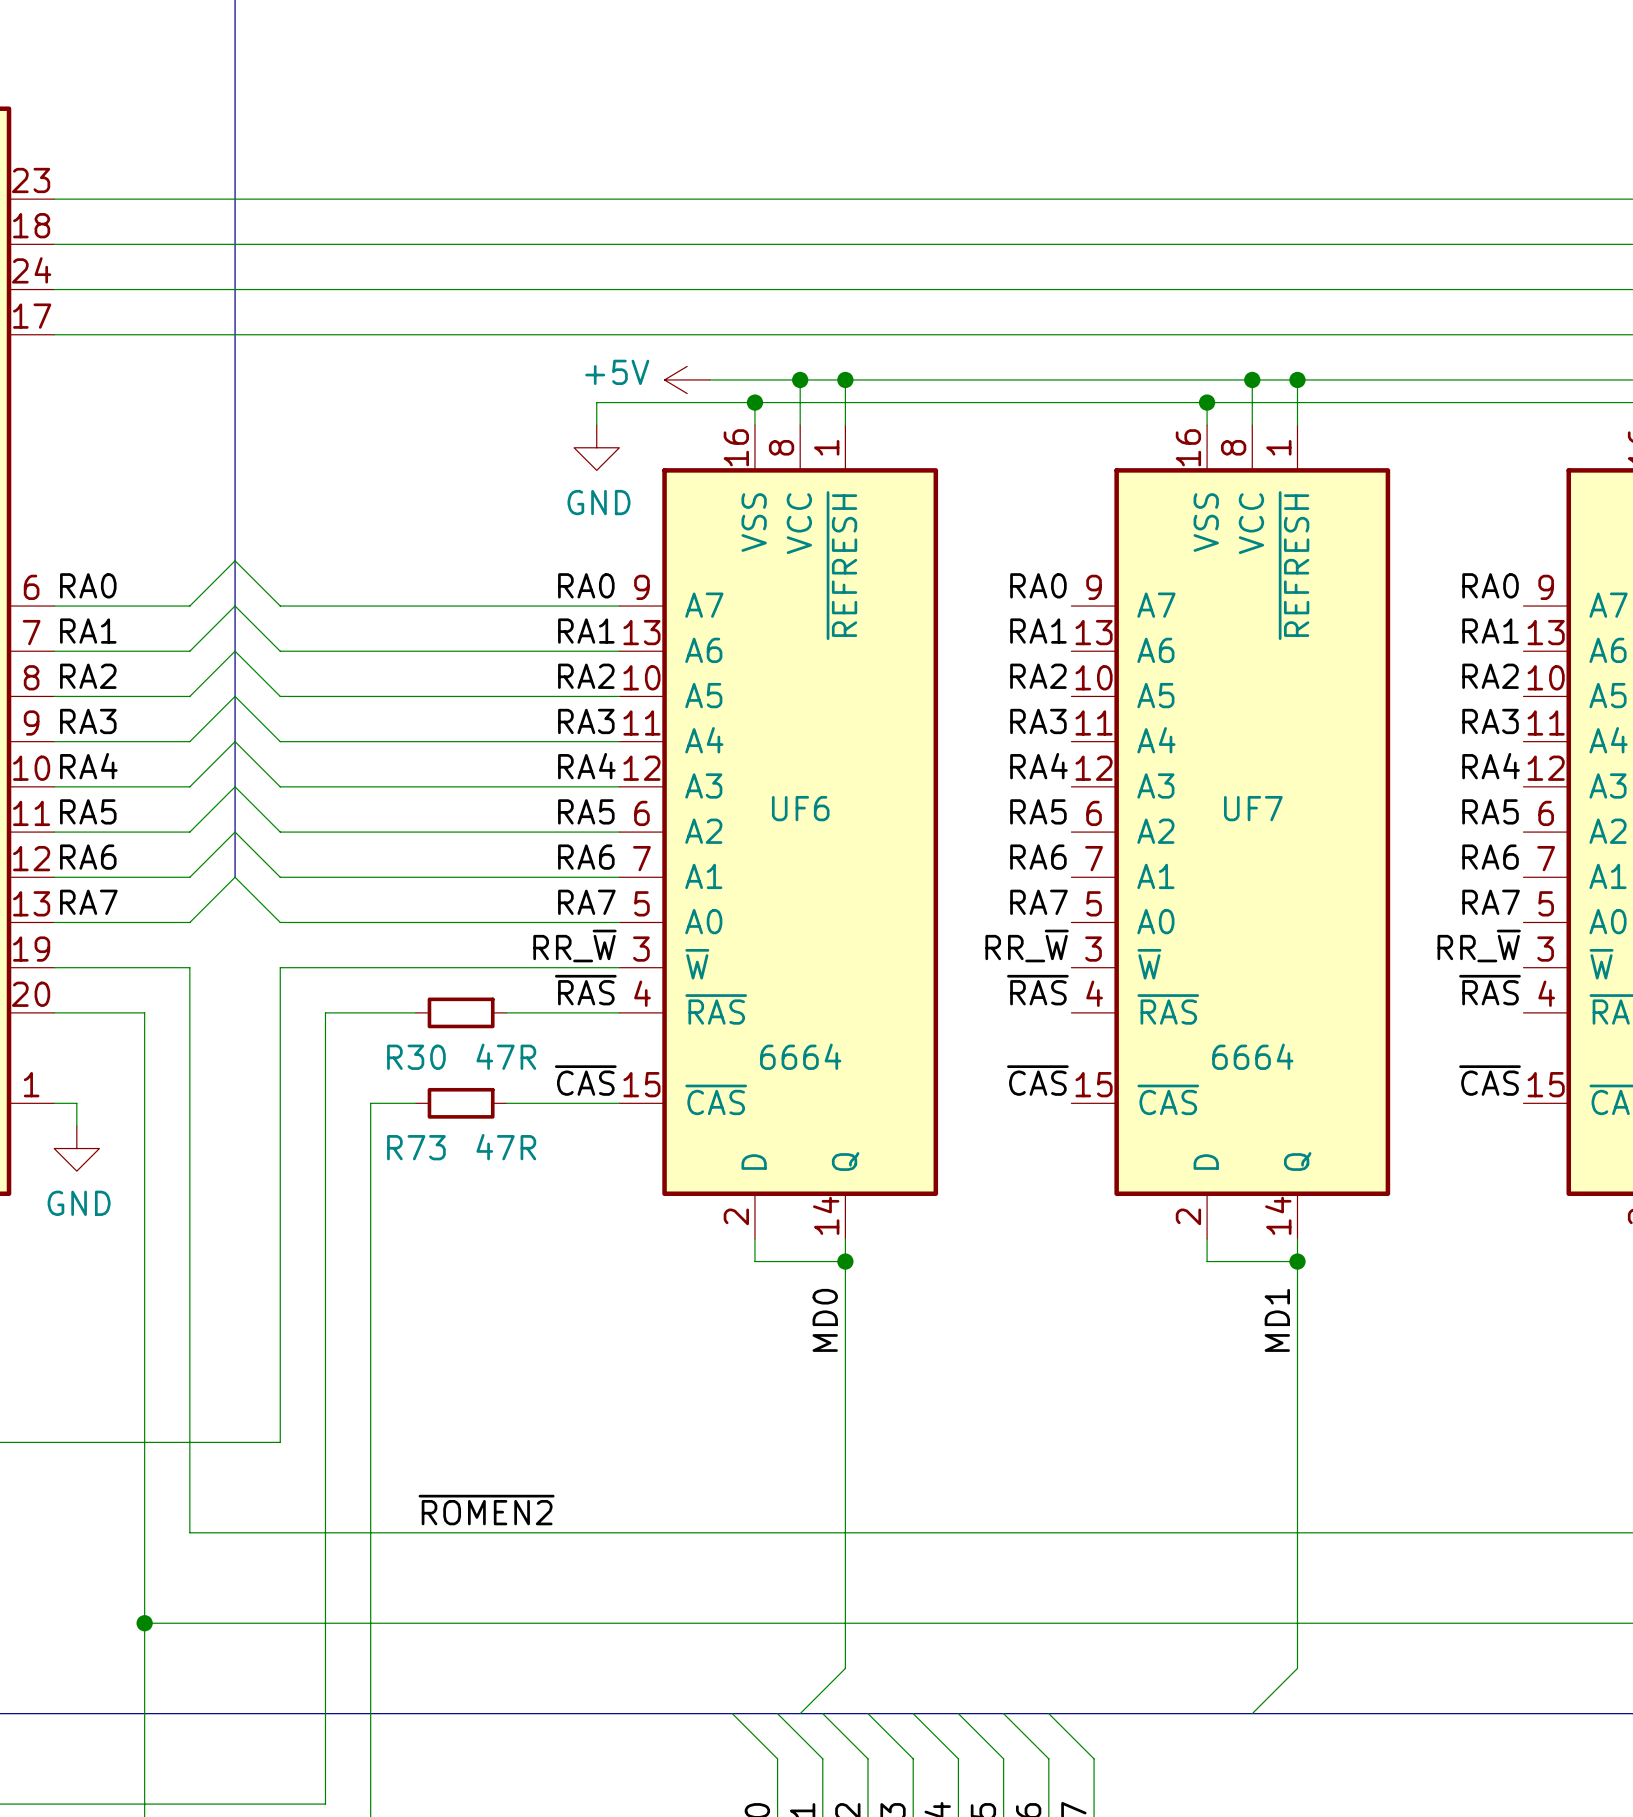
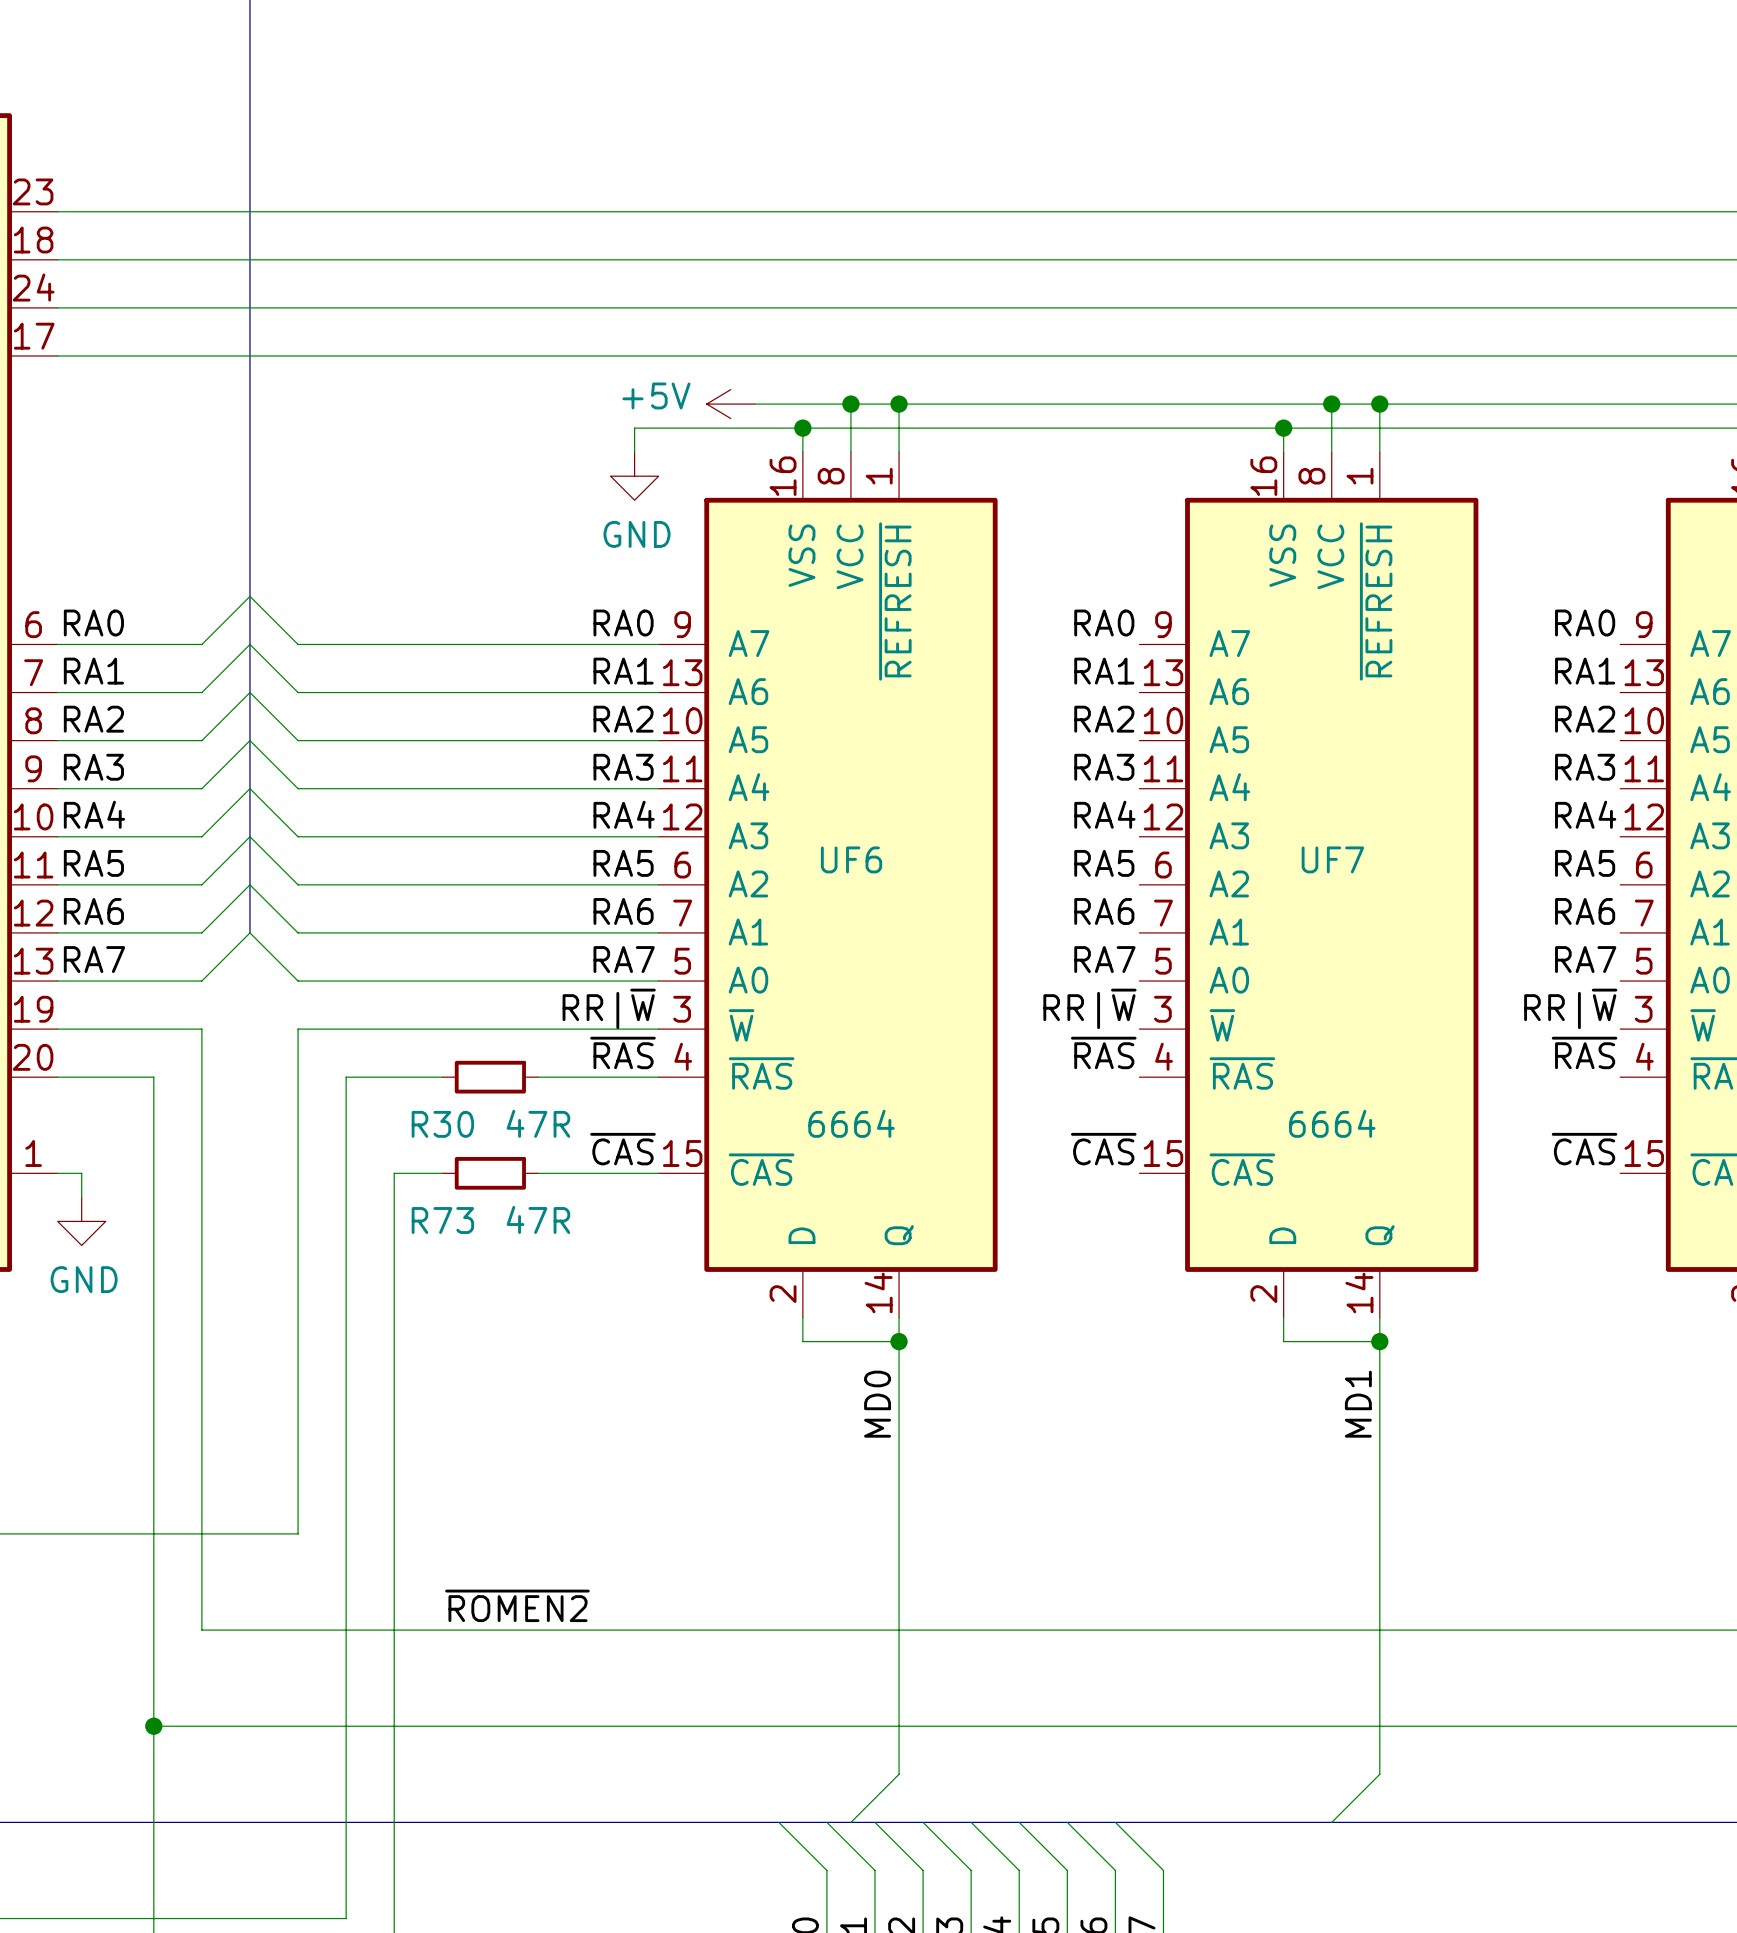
label: RR_~{W} (574, 946) -> RR|~{W} (609, 1008)
label: RR_~{W} (1027, 946) -> RR|~{W} (1089, 1008)
label: RR_~{W} (1479, 946) -> RR|~{W} (1570, 1008)

